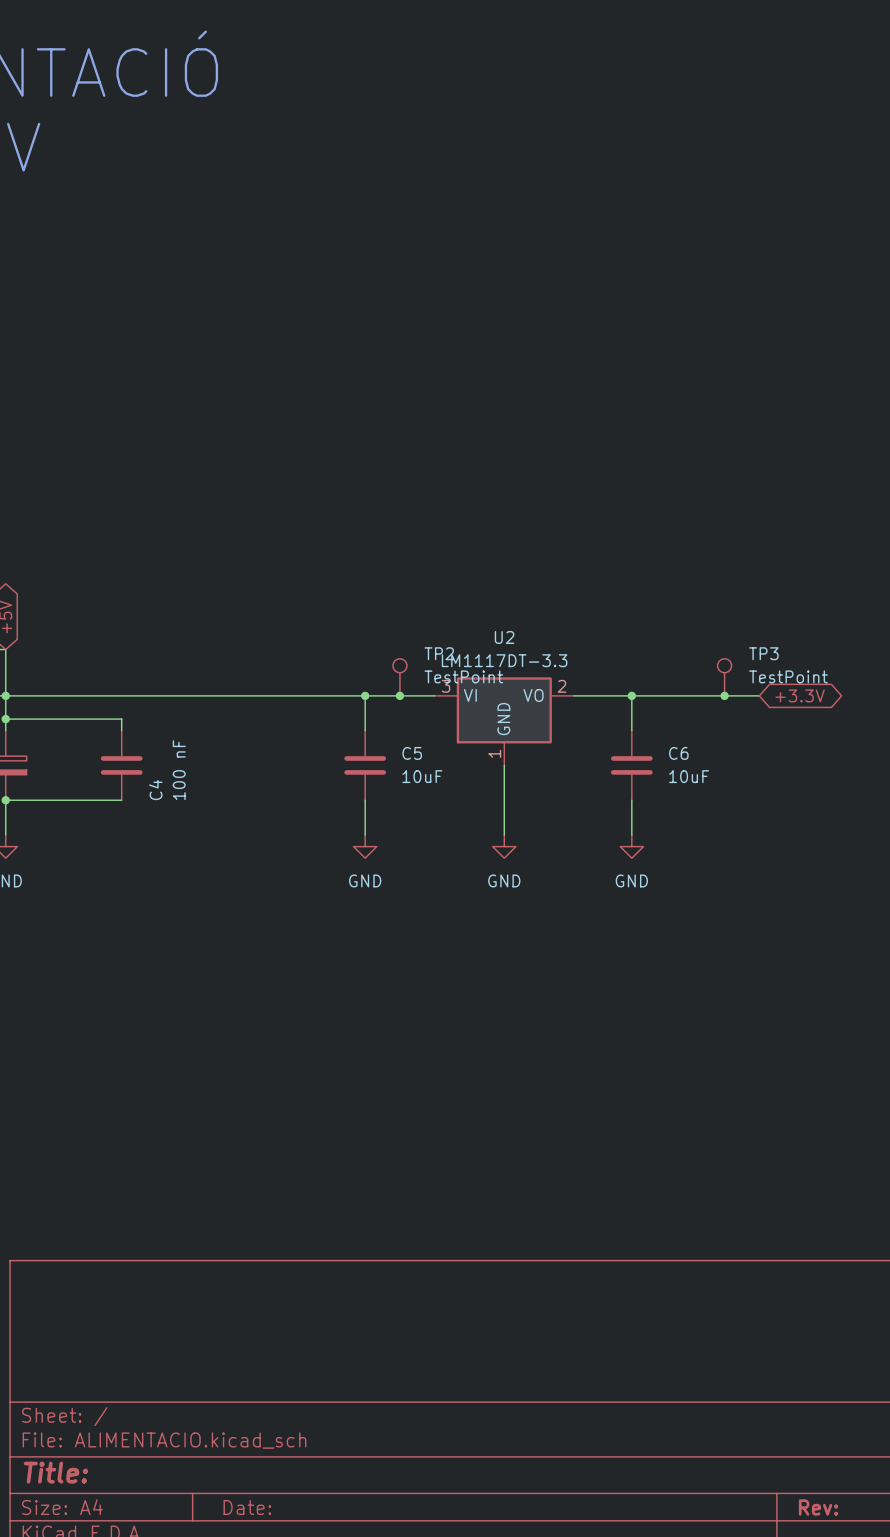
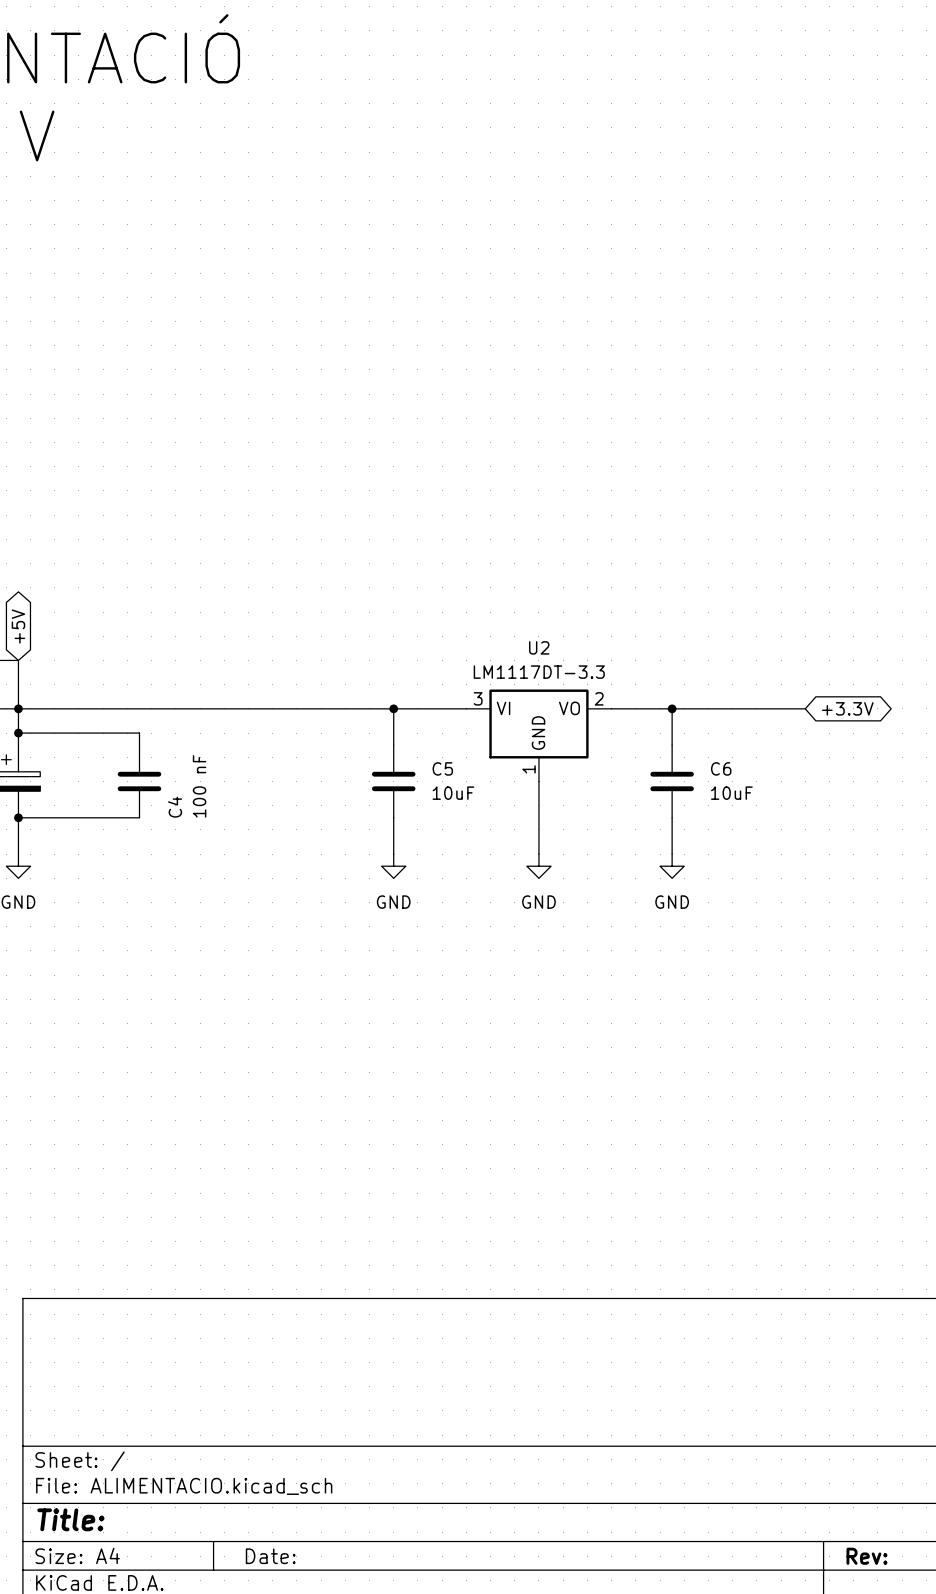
TP2: TestPoint (399, 677) -> none
TP3: TestPoint (724, 677) -> none
junction: (399, 695) -> none
junction: (724, 695) -> none

